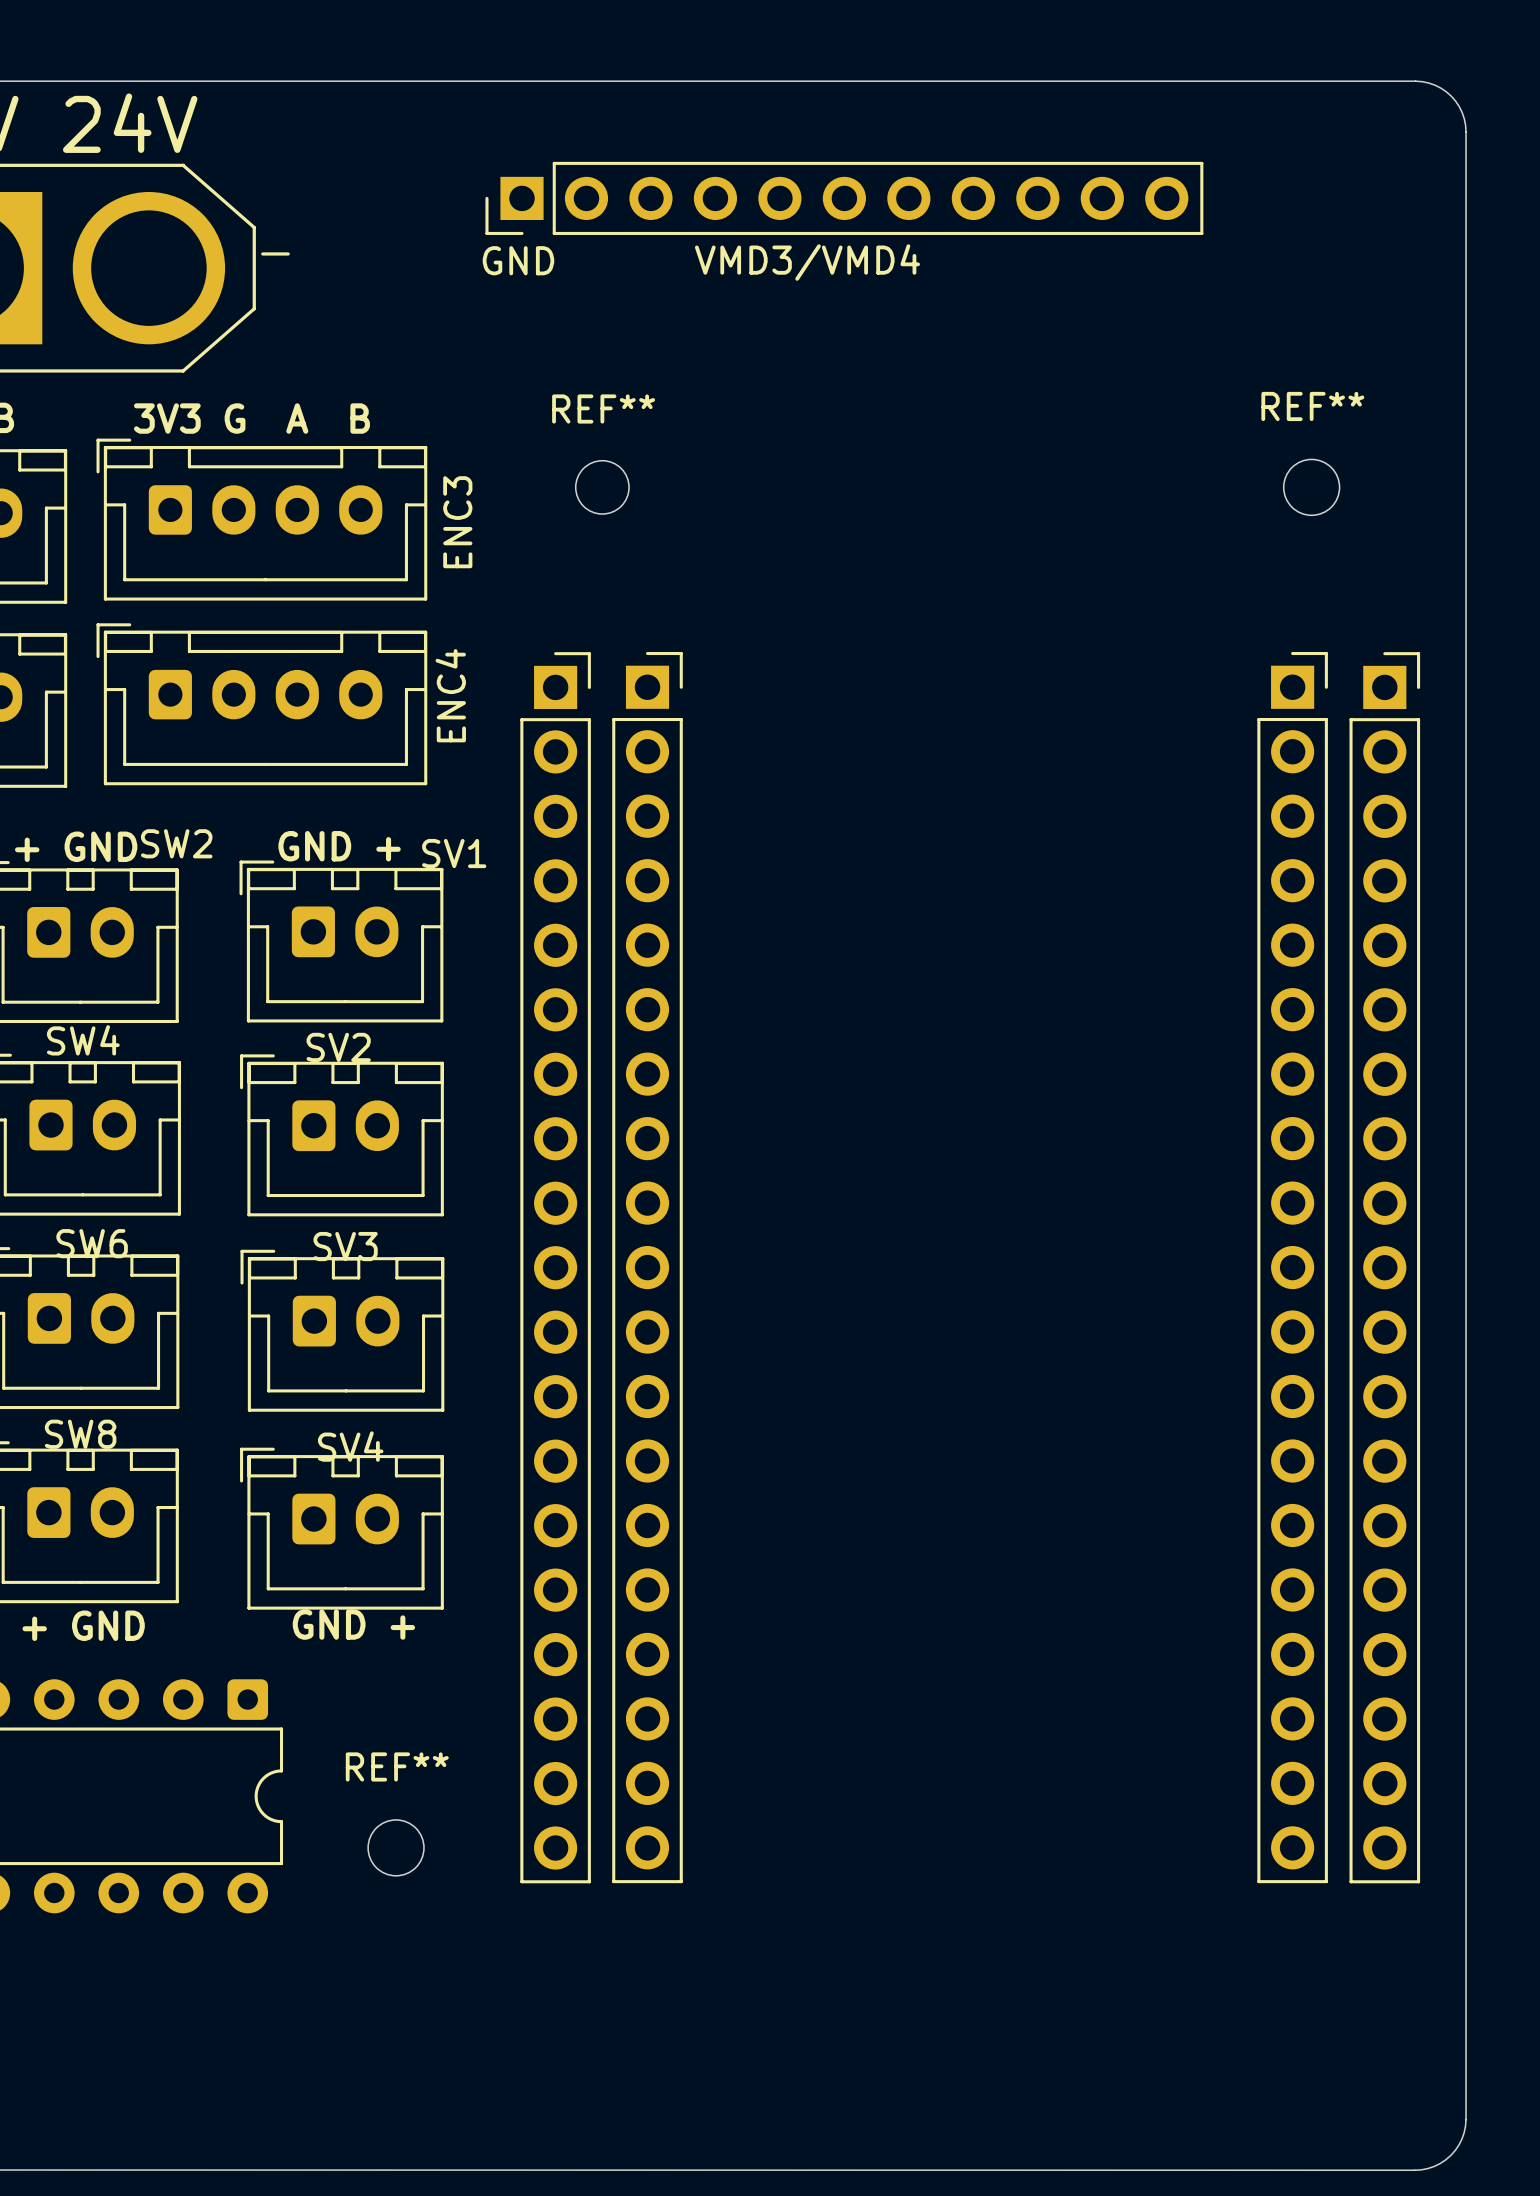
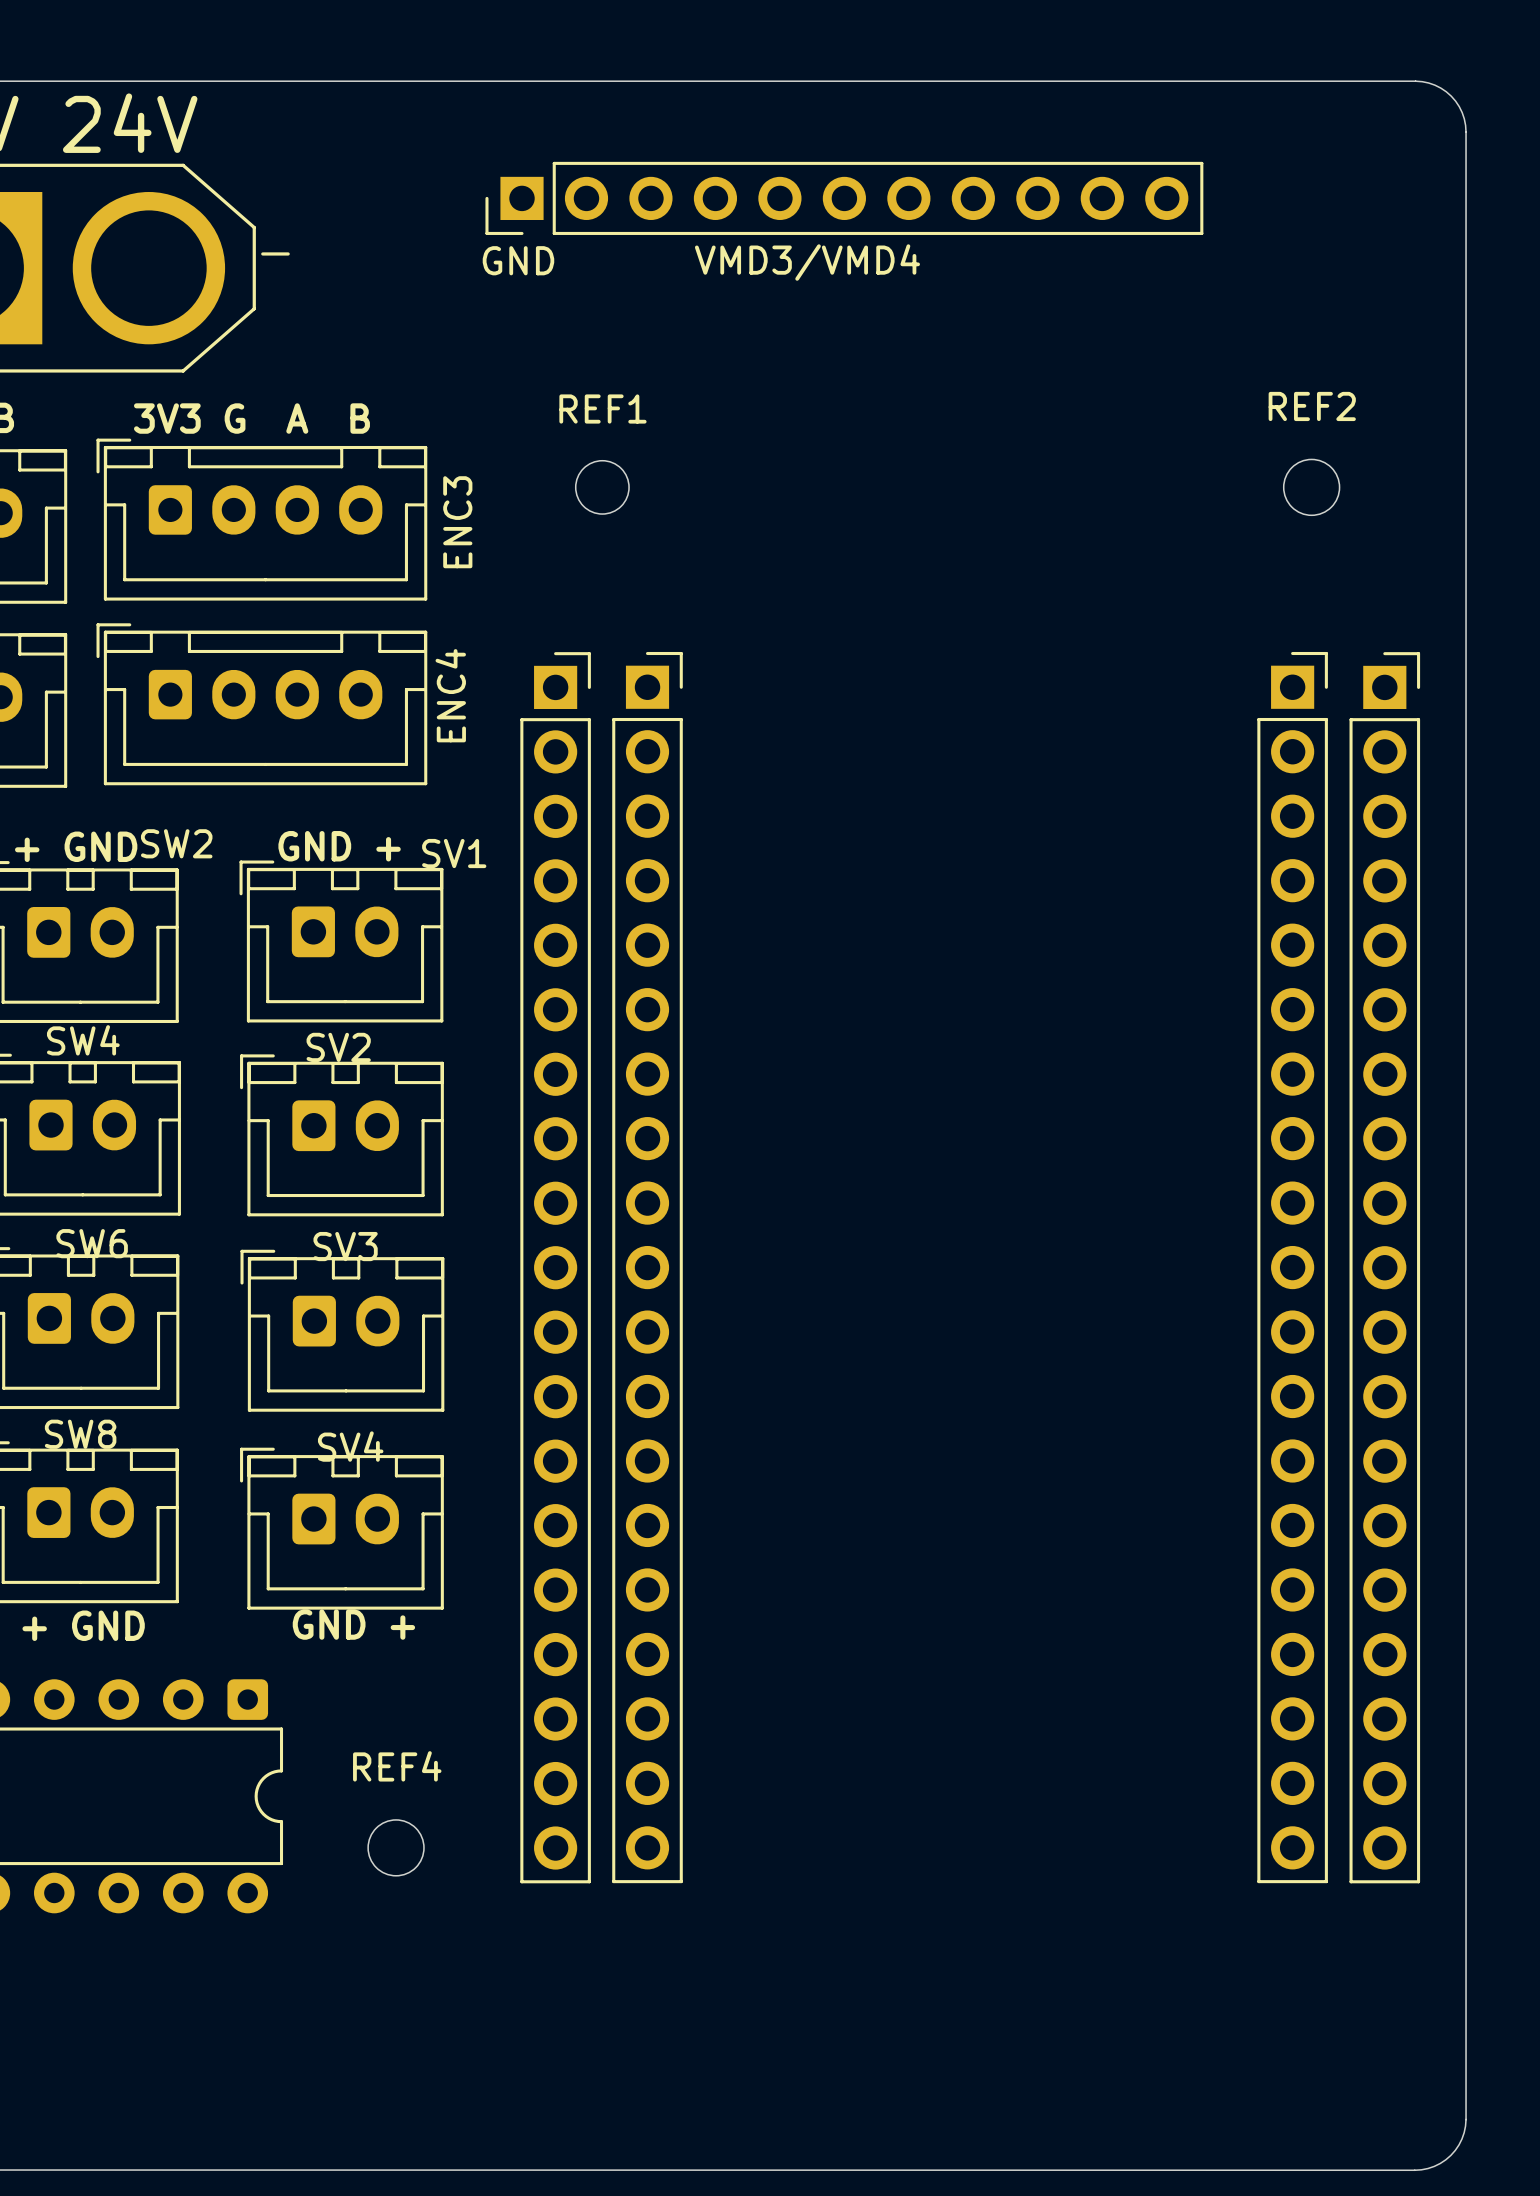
REF** name: REF** (1312, 406) -> REF2 (1312, 406)
REF** name: REF** (603, 409) -> REF1 (602, 409)
REF** name: REF** (397, 1766) -> REF4 (397, 1766)

